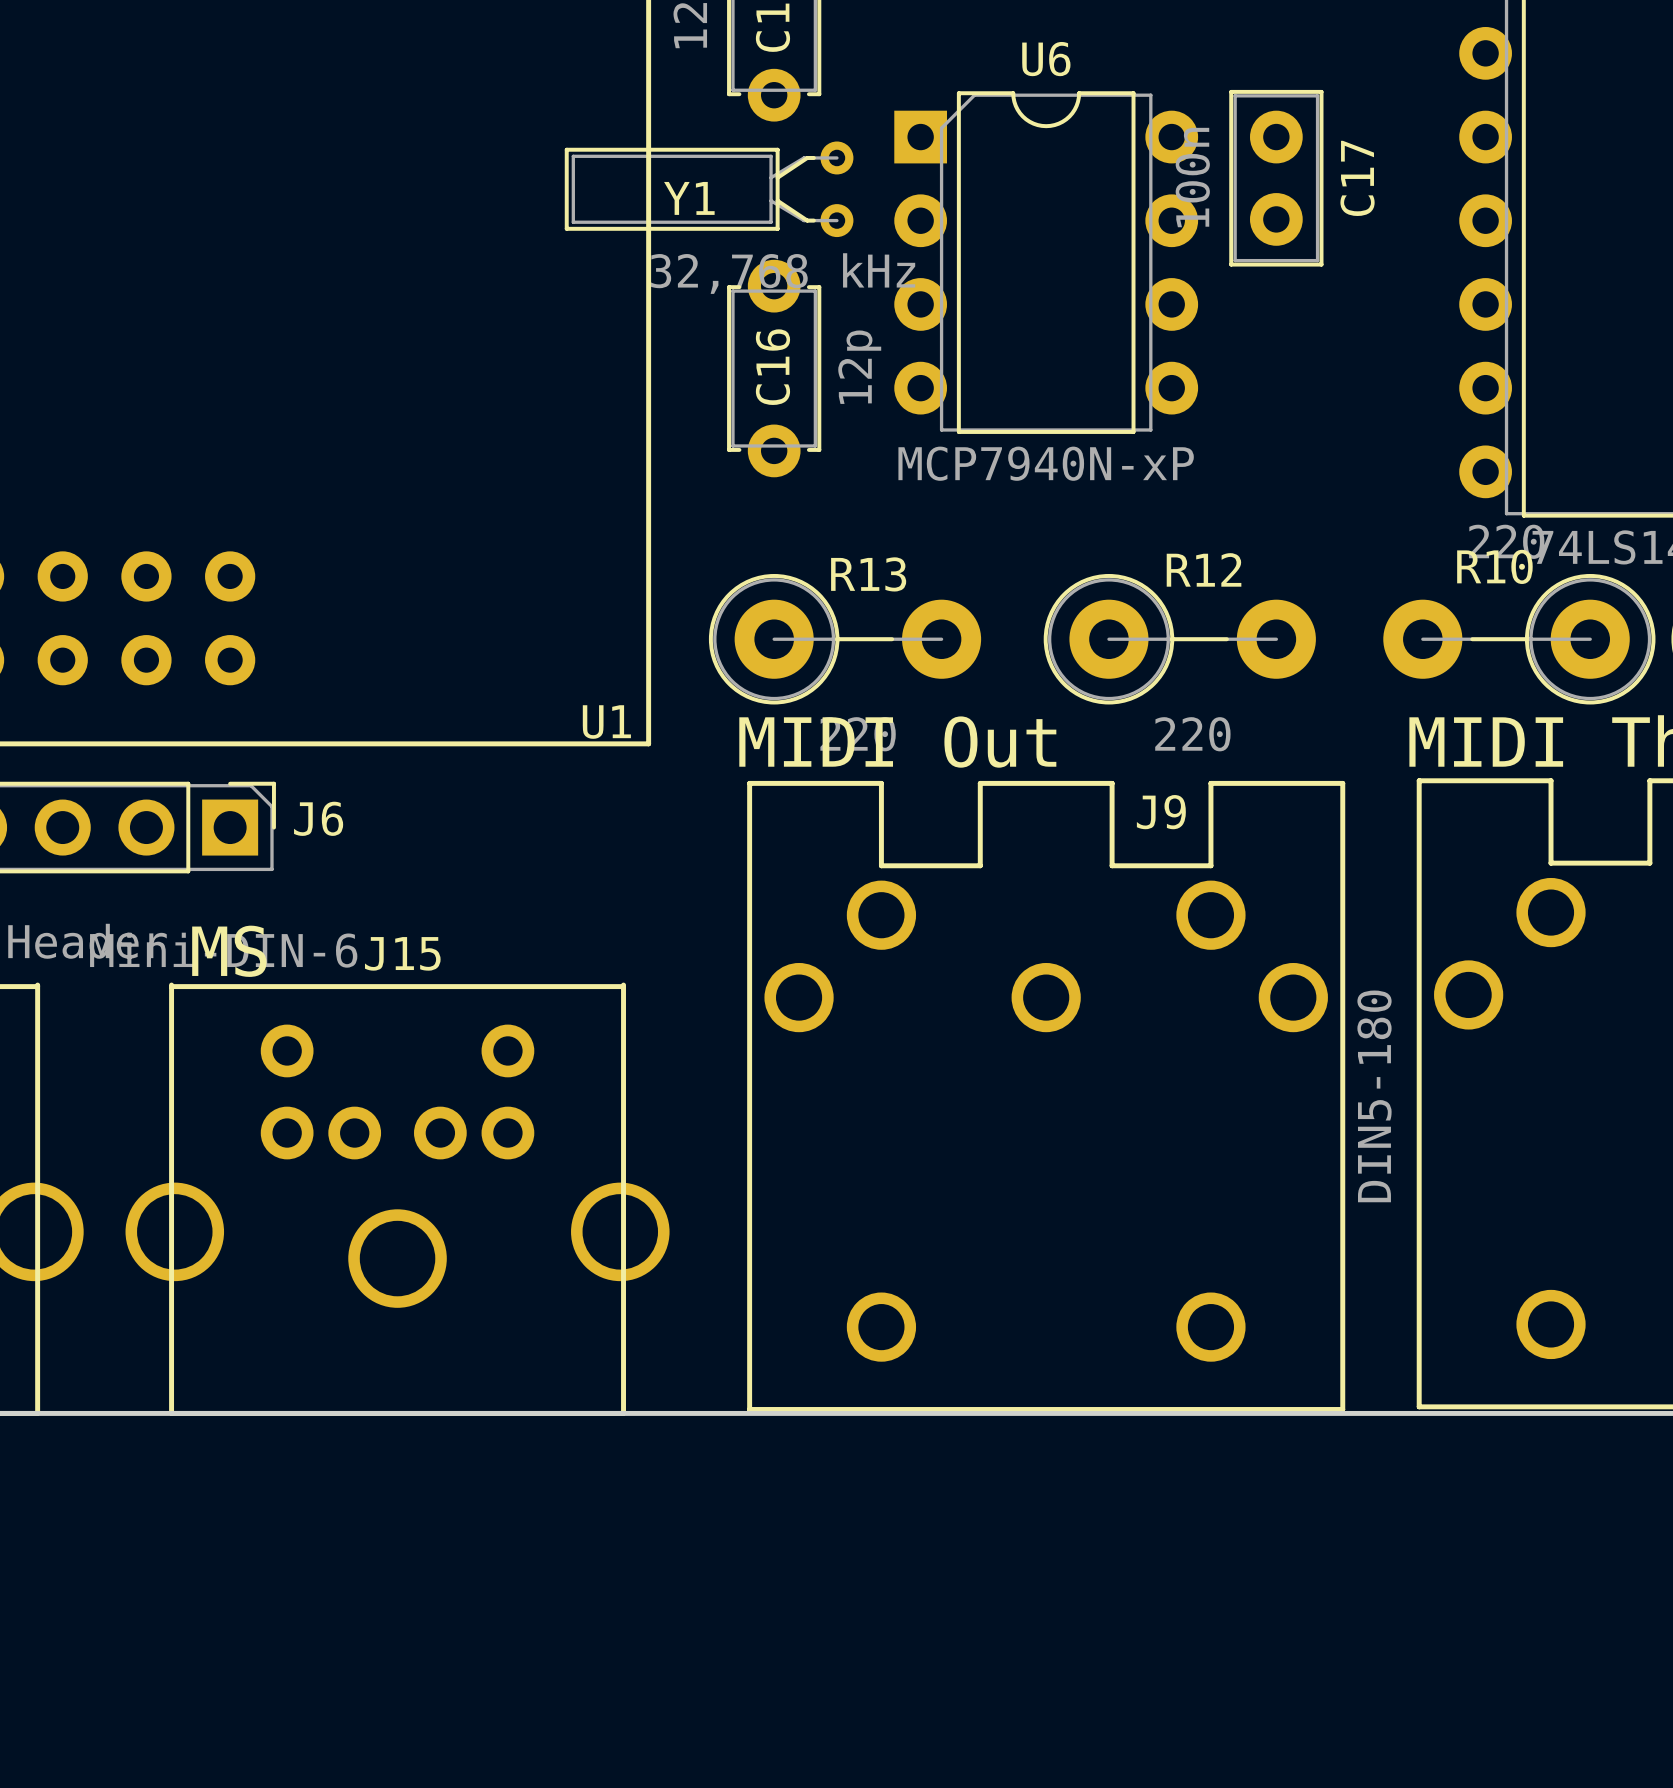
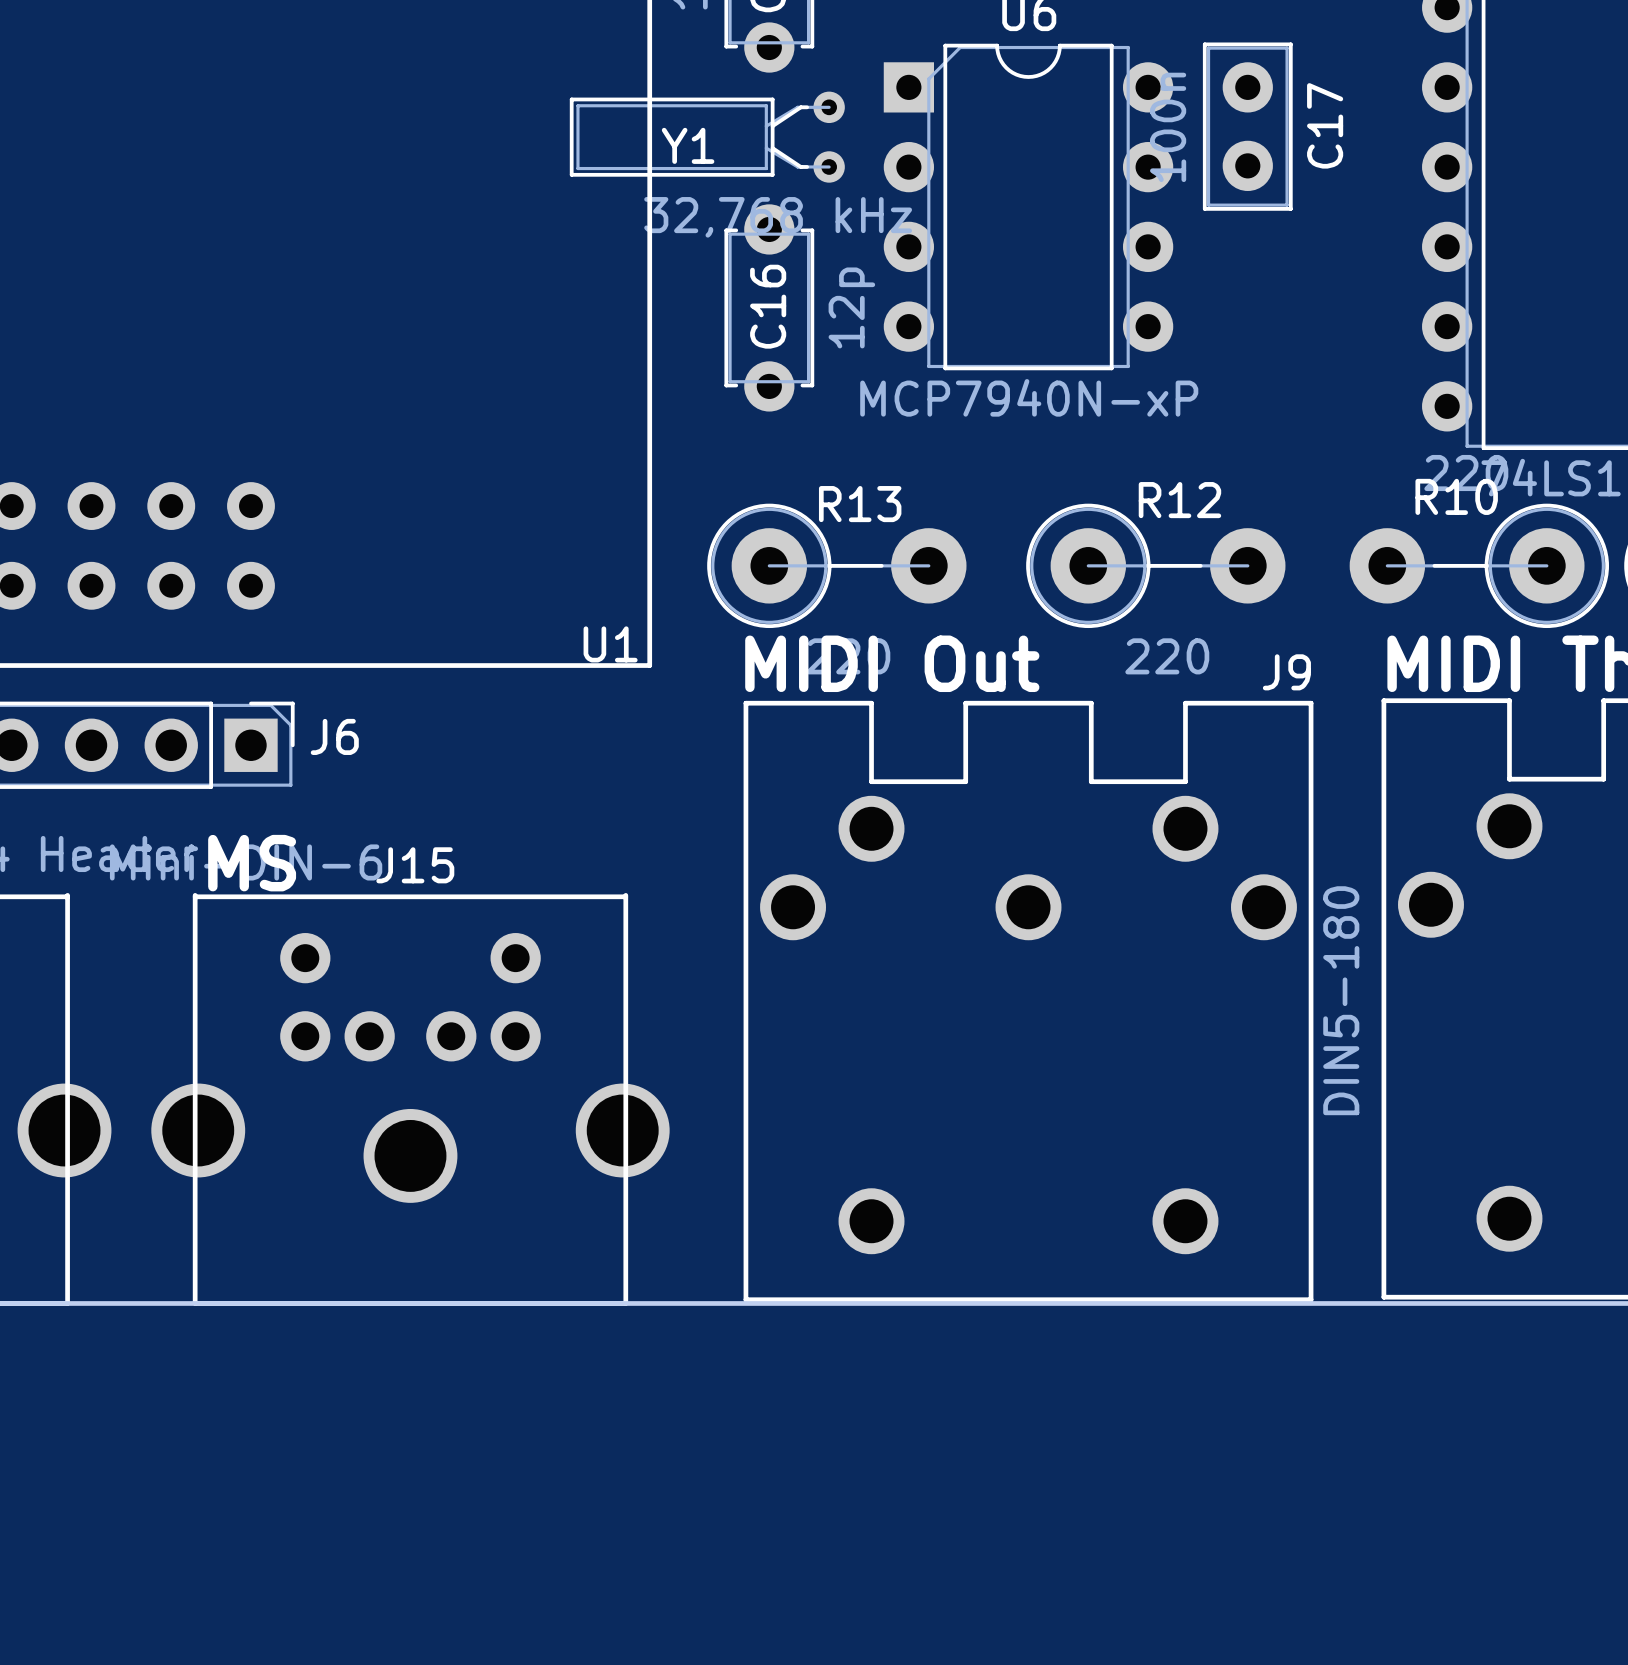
J9 name position: J9 (1161, 812) -> J9 (1286, 672)

